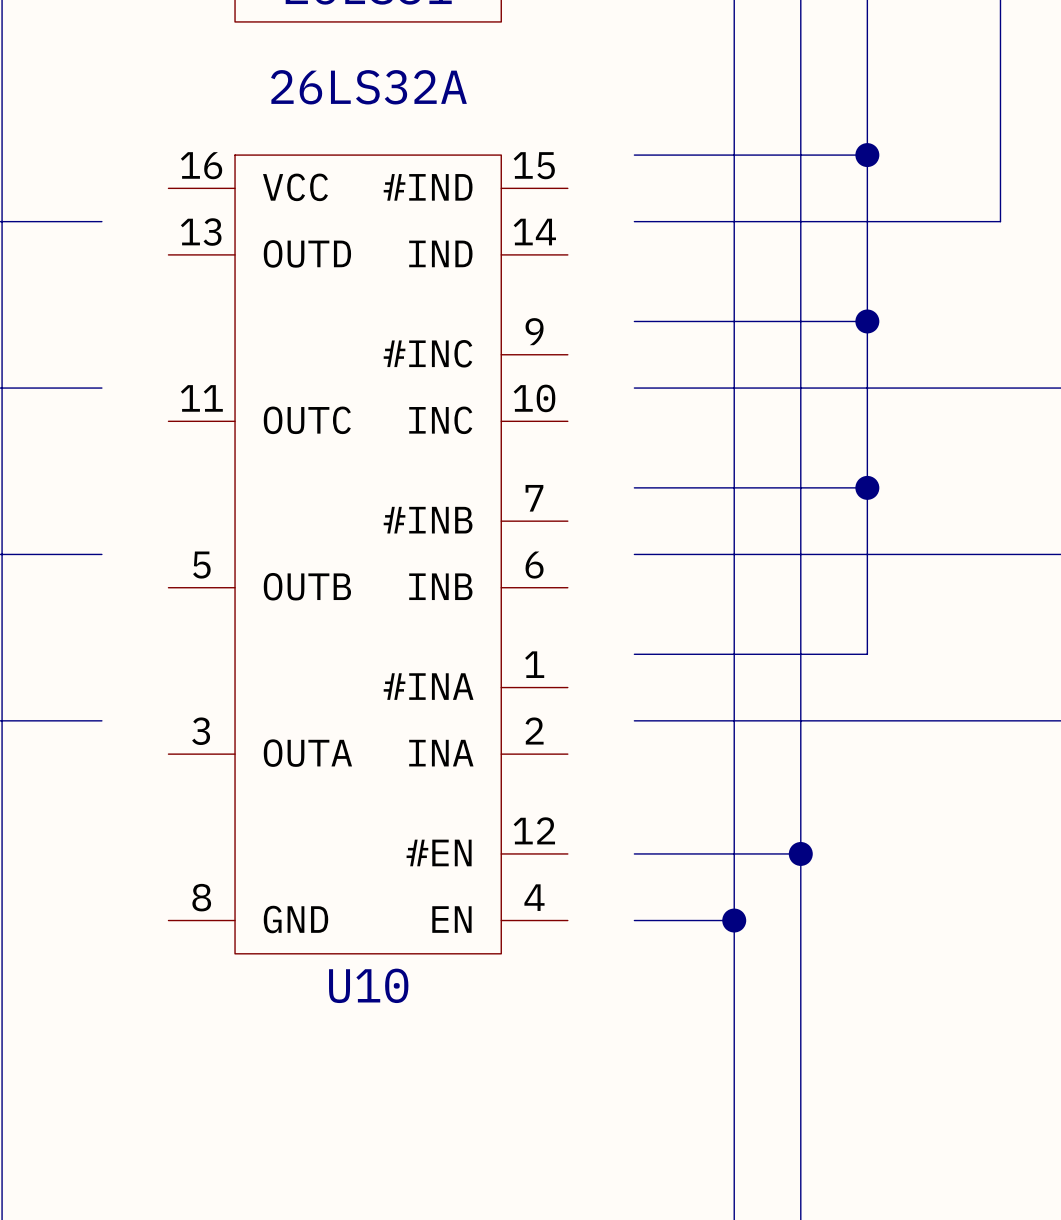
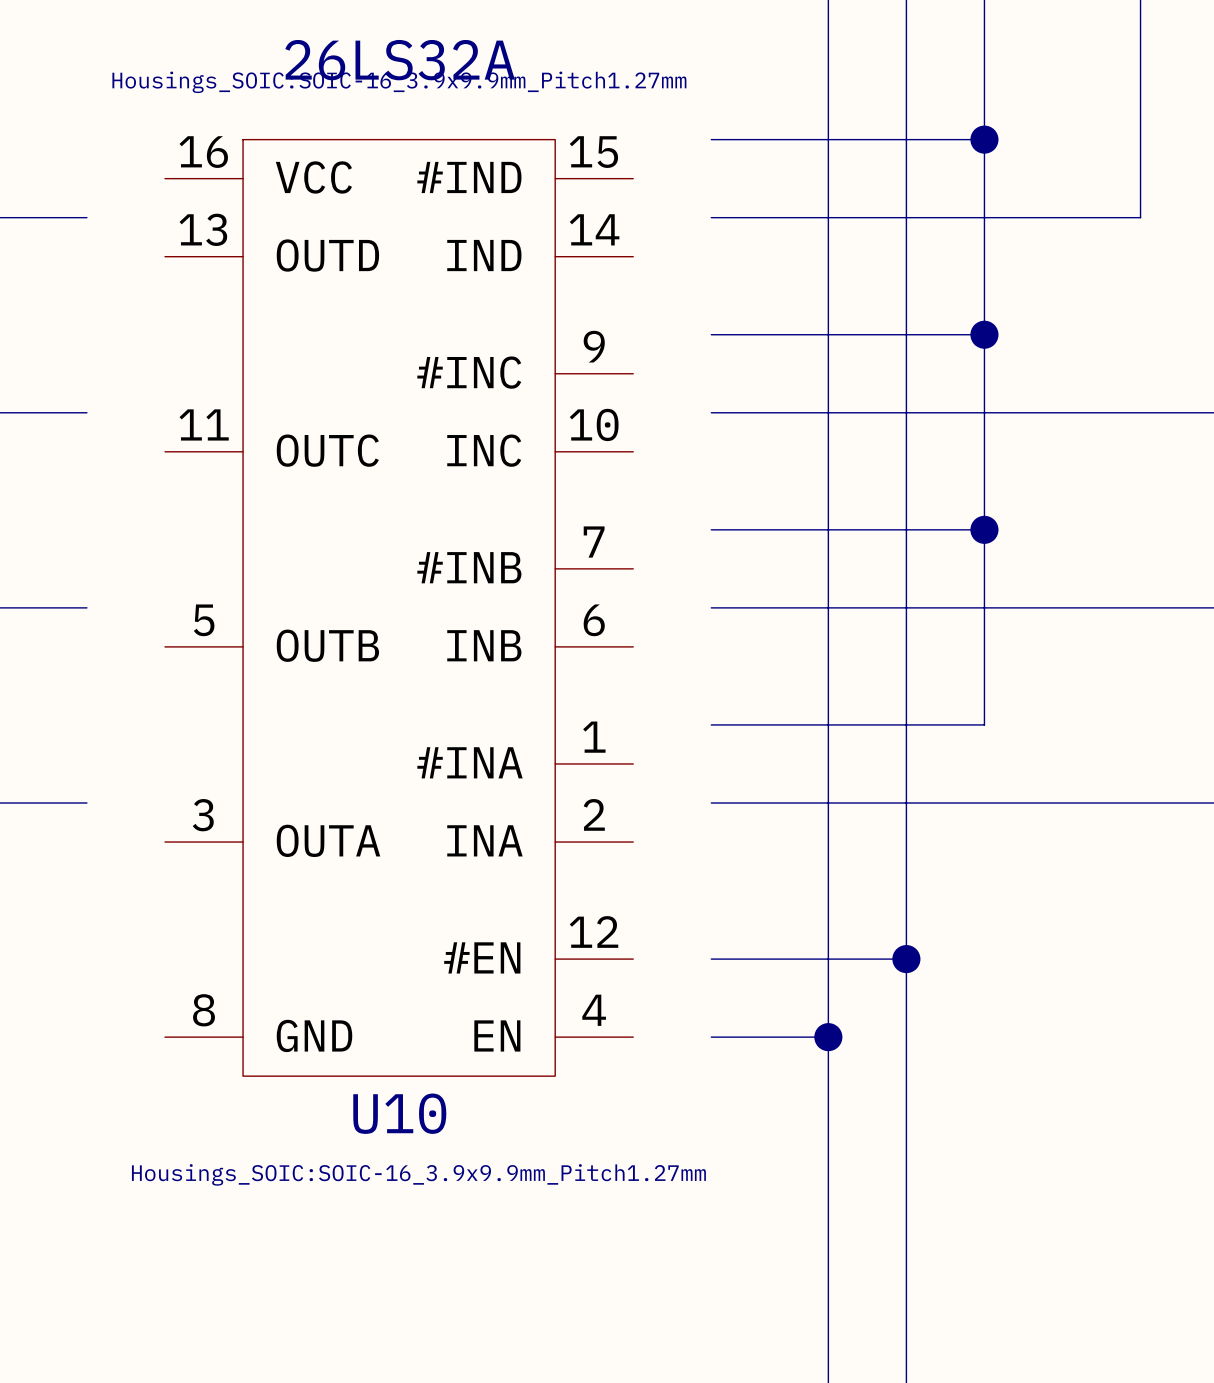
part text: none -> Housings_SOIC:SOIC-16_3.9x9.9mm_Pitch1.27mm (399, 82)
U10 text: none -> Housings_SOIC:SOIC-16_3.9x9.9mm_Pitch1.27mm (418, 1174)

